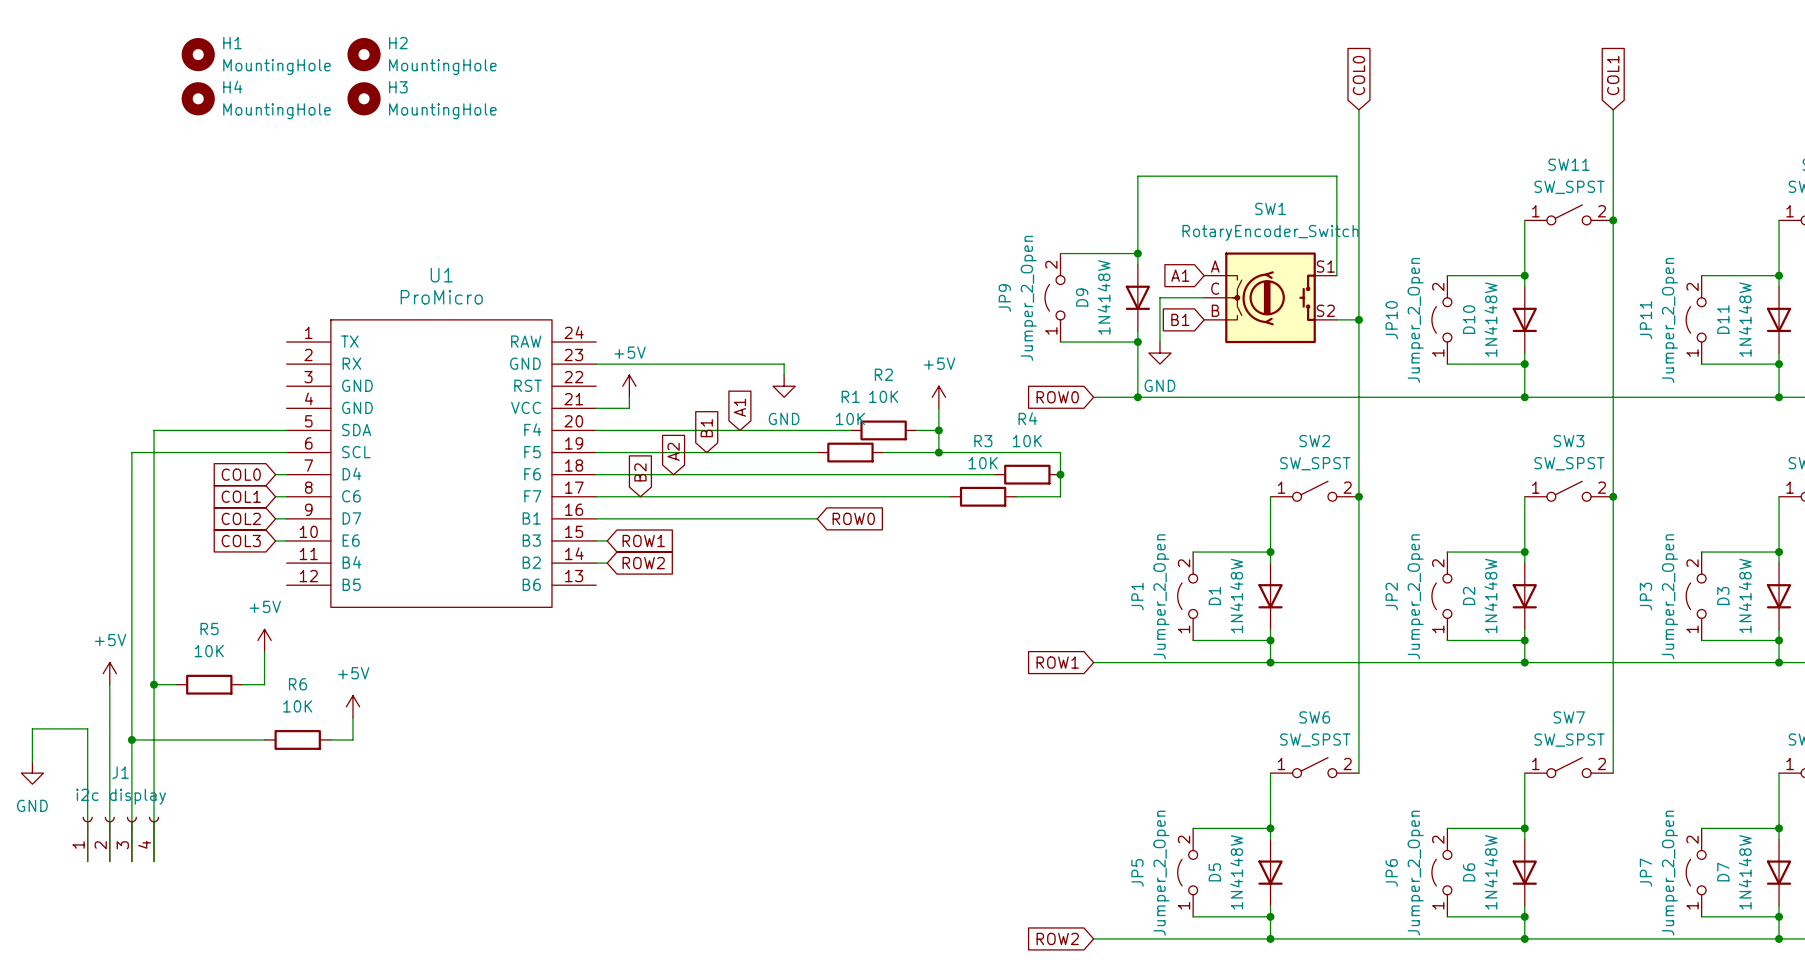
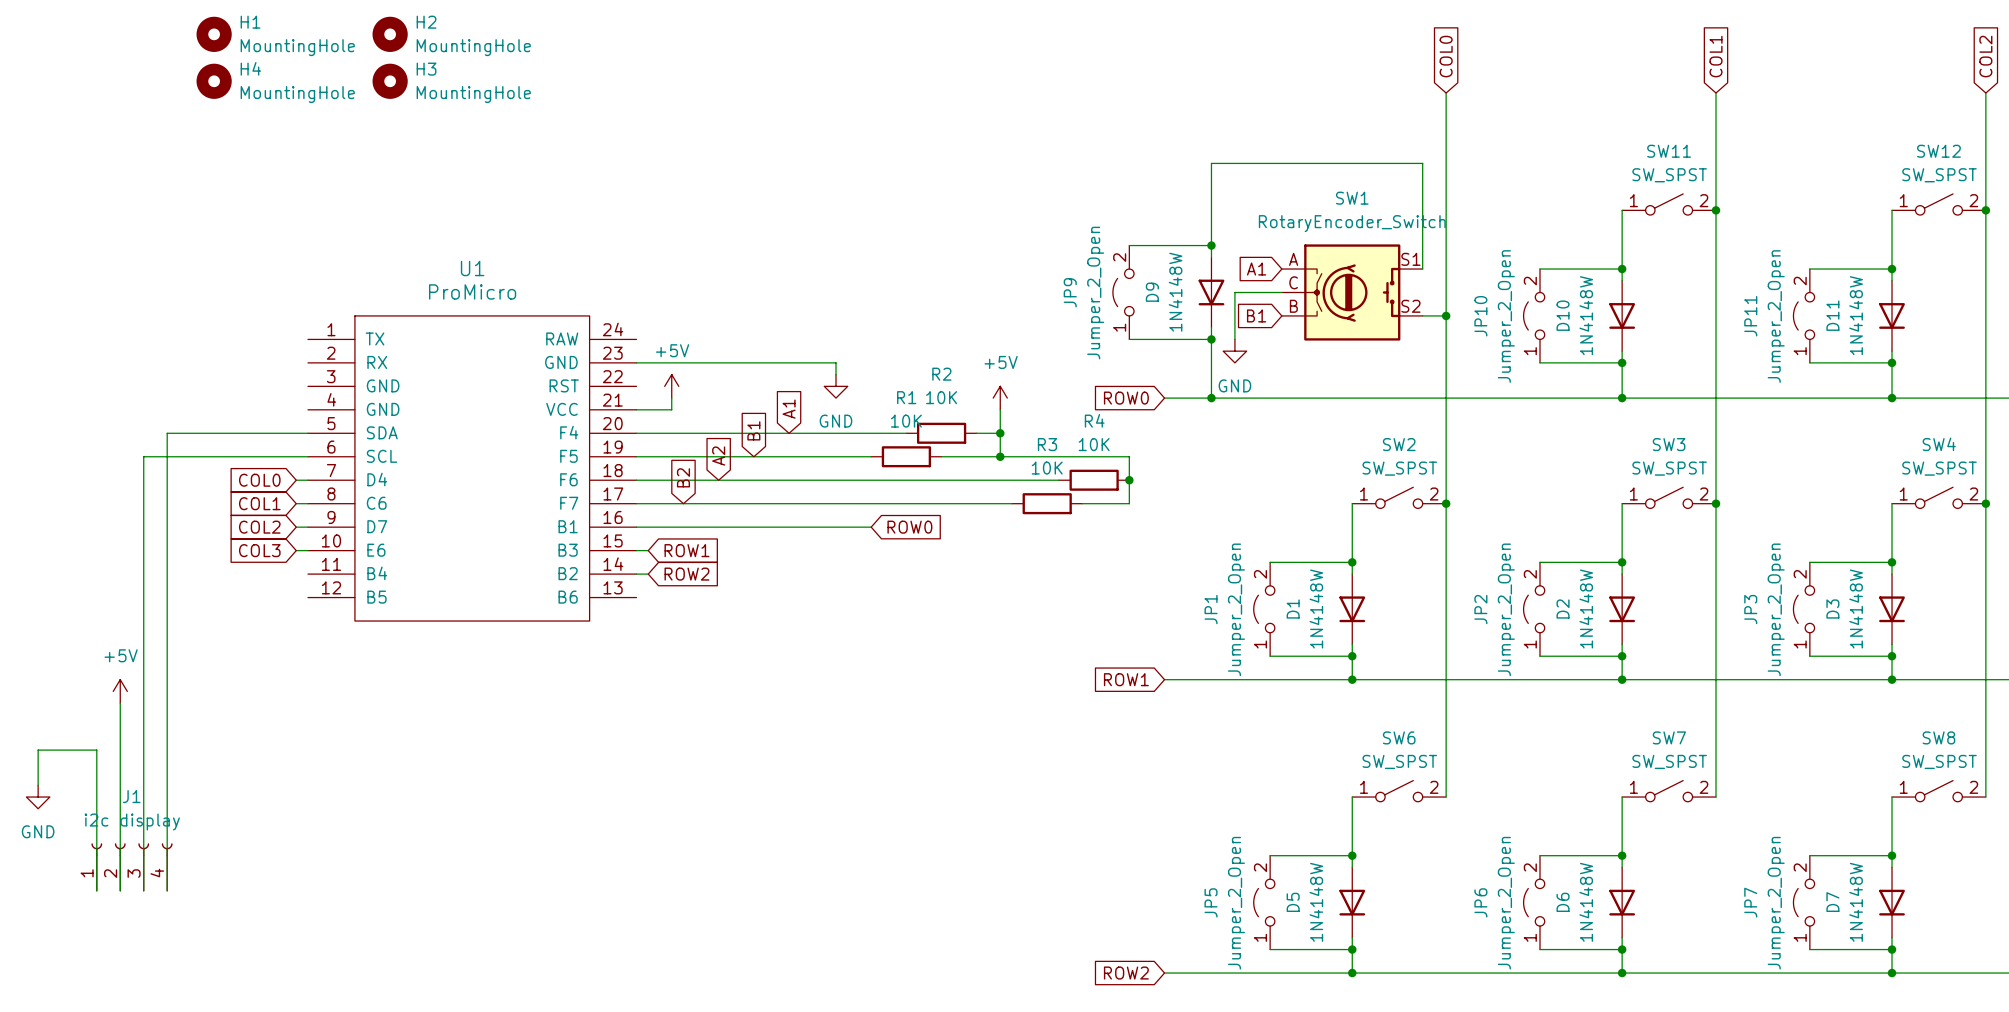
power symbol: +5V (264, 640) -> none
wire: (264, 651) (264, 684) (242, 684) -> none
wire: (154, 684) (176, 684) -> none
junction: (154, 684) -> none
R5: 10K (209, 684) -> none
power symbol: +5V (352, 706) -> none
wire: (352, 717) (352, 739) (330, 739) -> none
wire: (131, 739) (264, 739) -> none
junction: (131, 739) -> none
R6: 10K (297, 739) -> none

